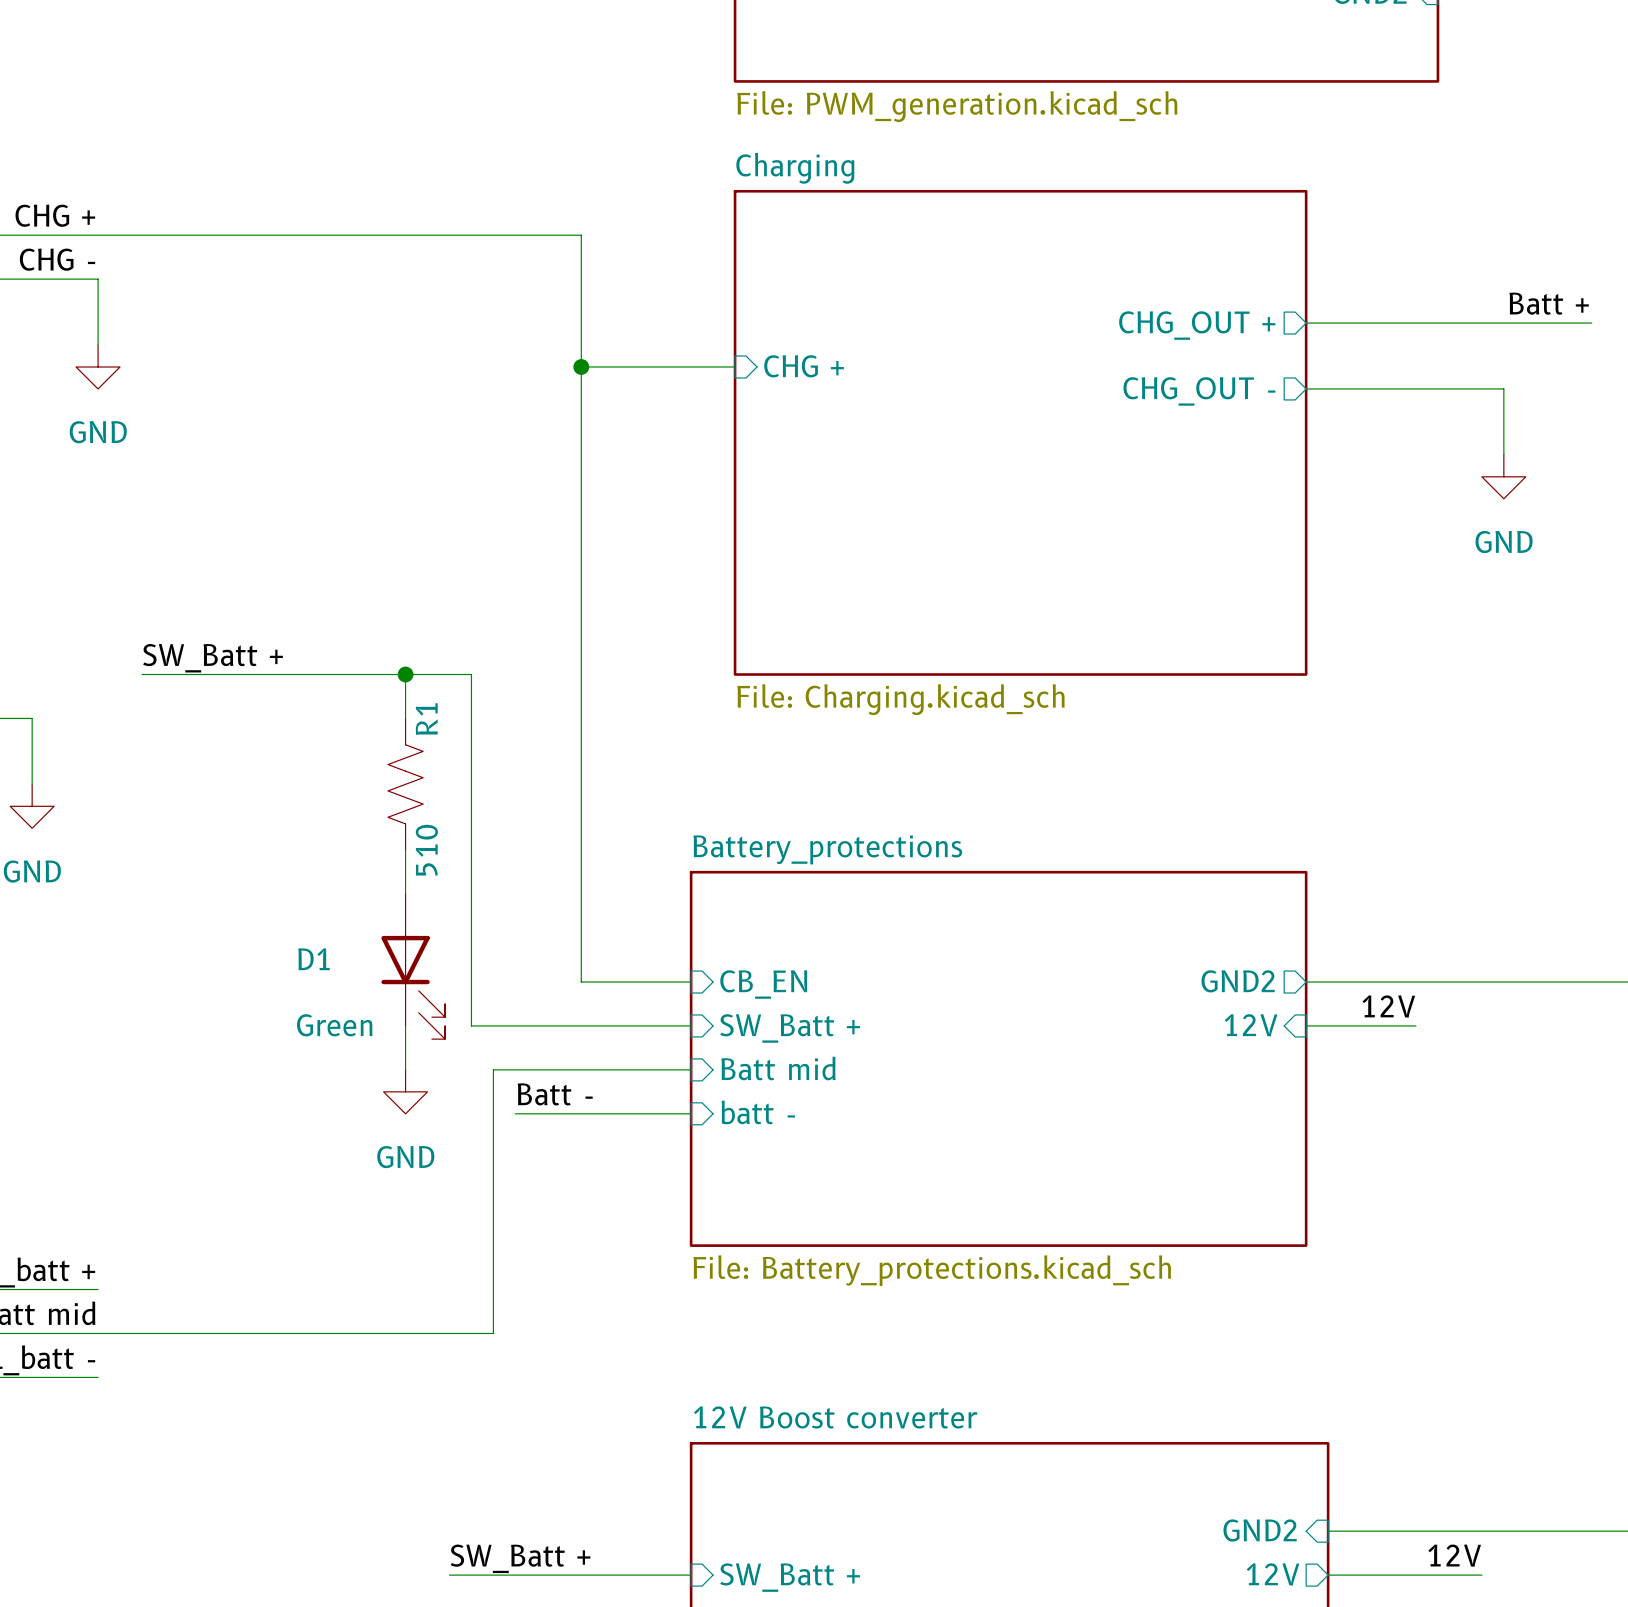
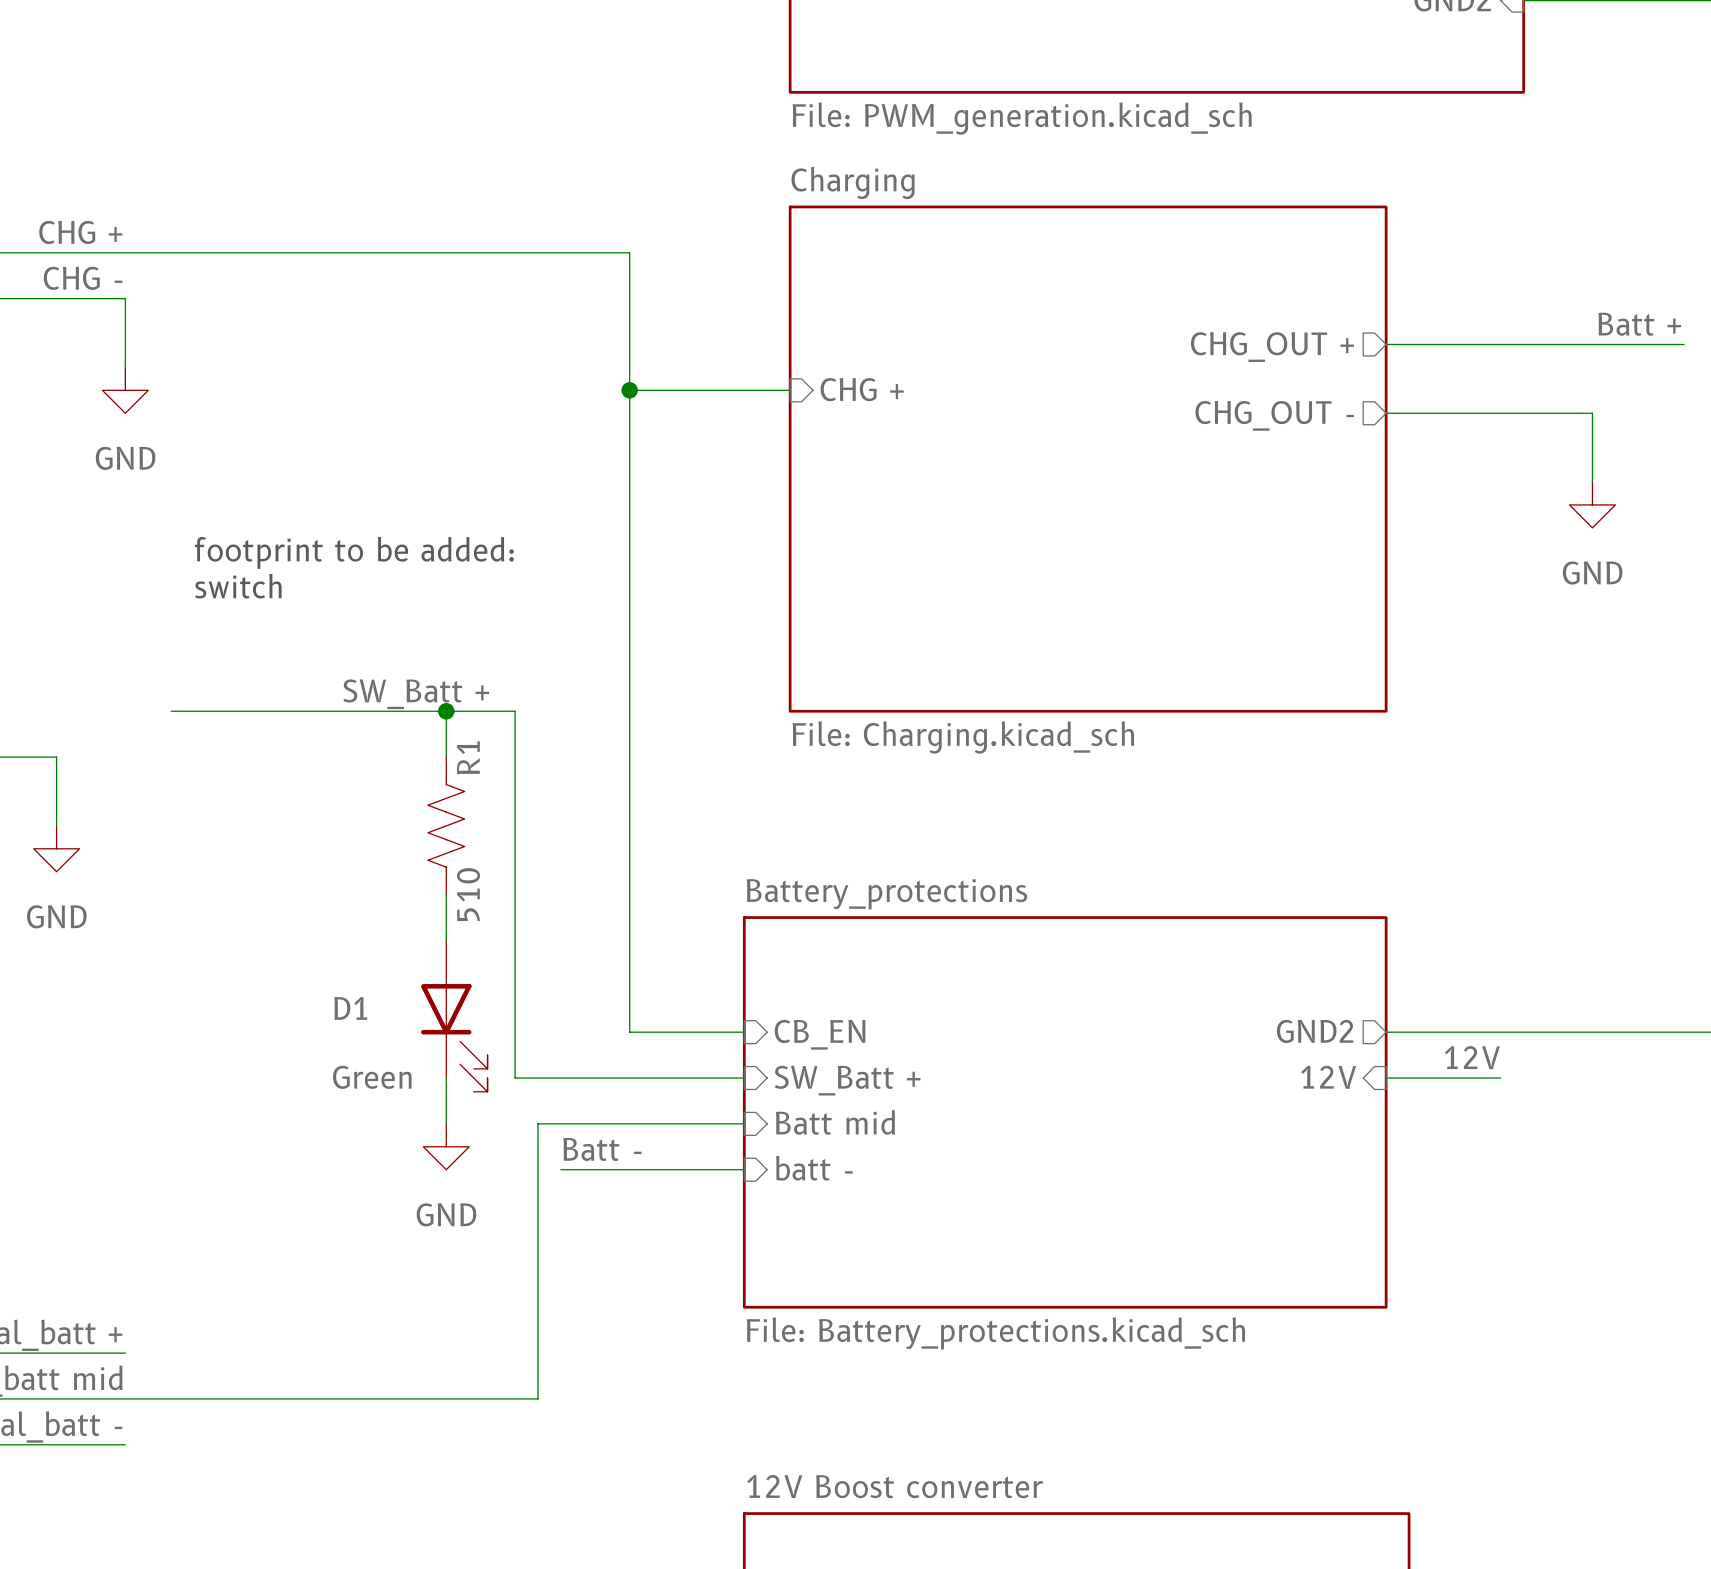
text: none -> footprint to be added: (354, 552)
text: none -> switch (238, 586)
label position: SW_Batt + (213, 658) -> SW_Batt + (416, 694)

